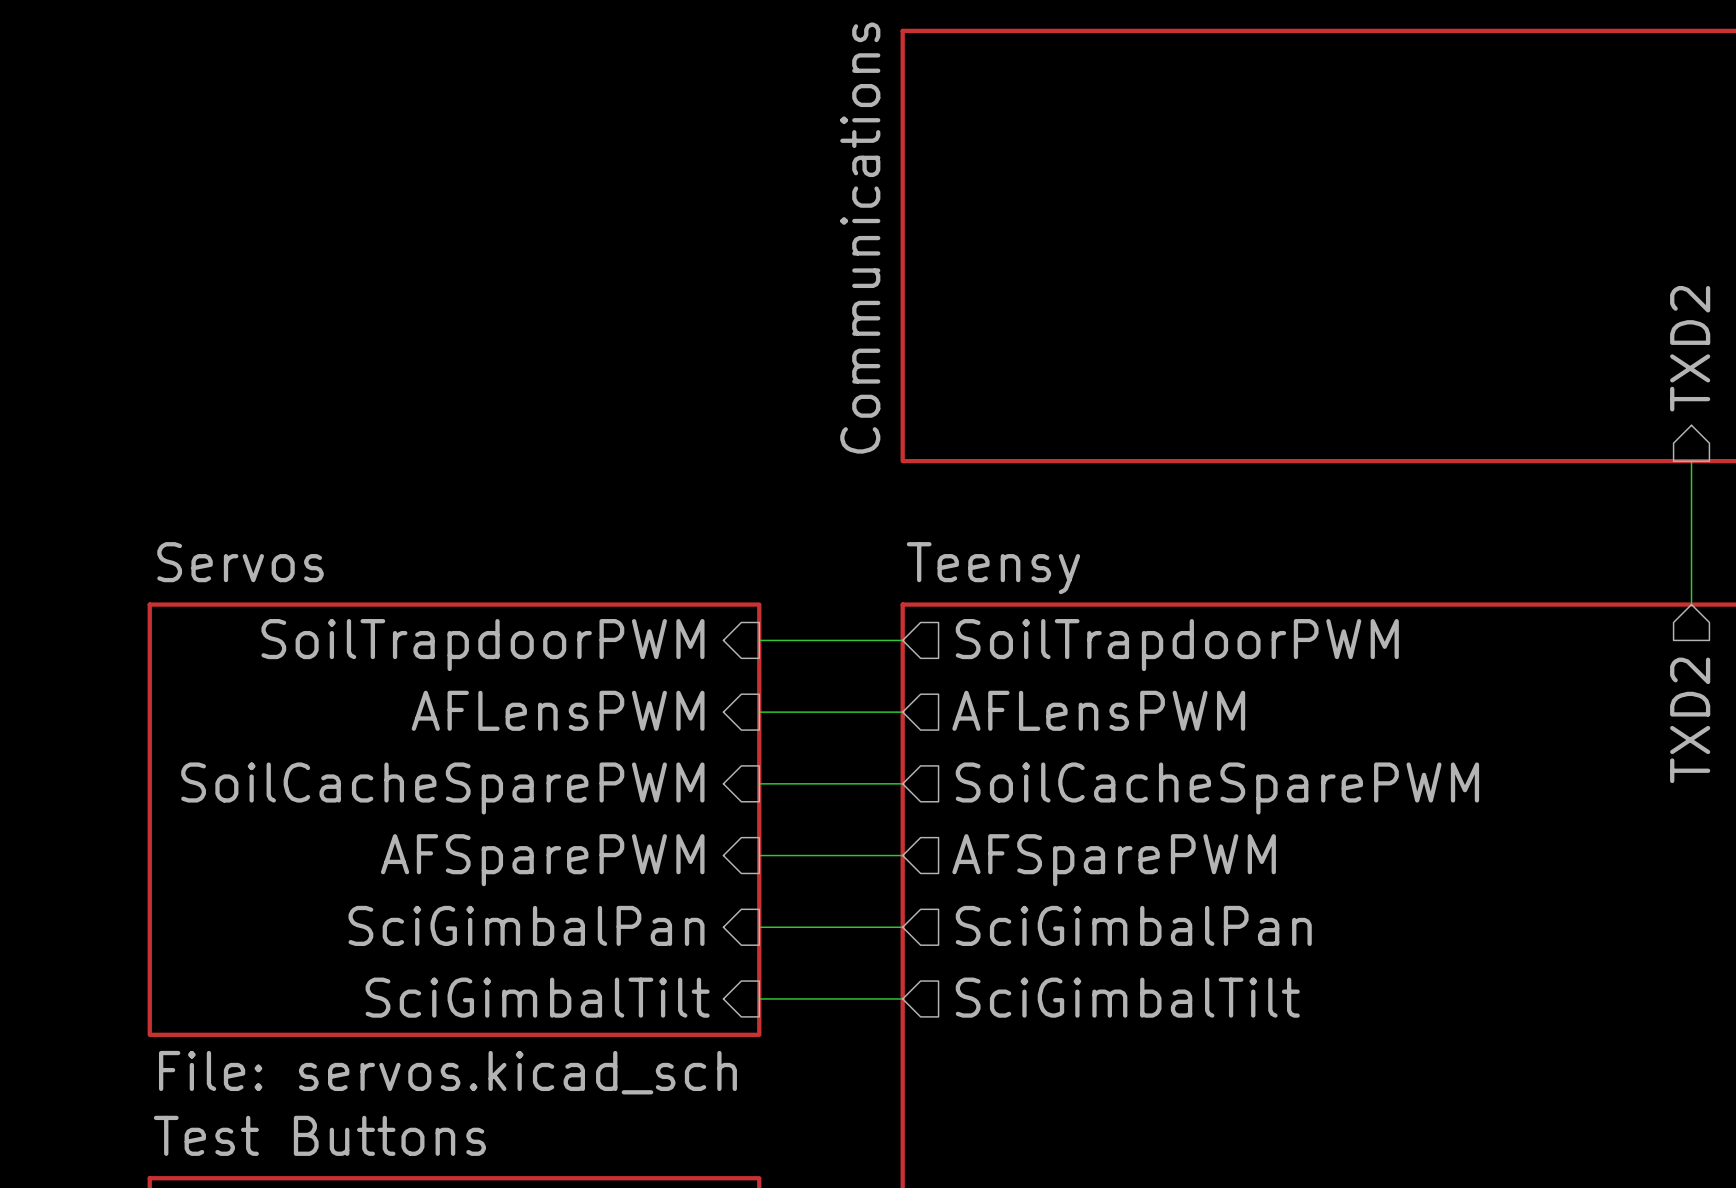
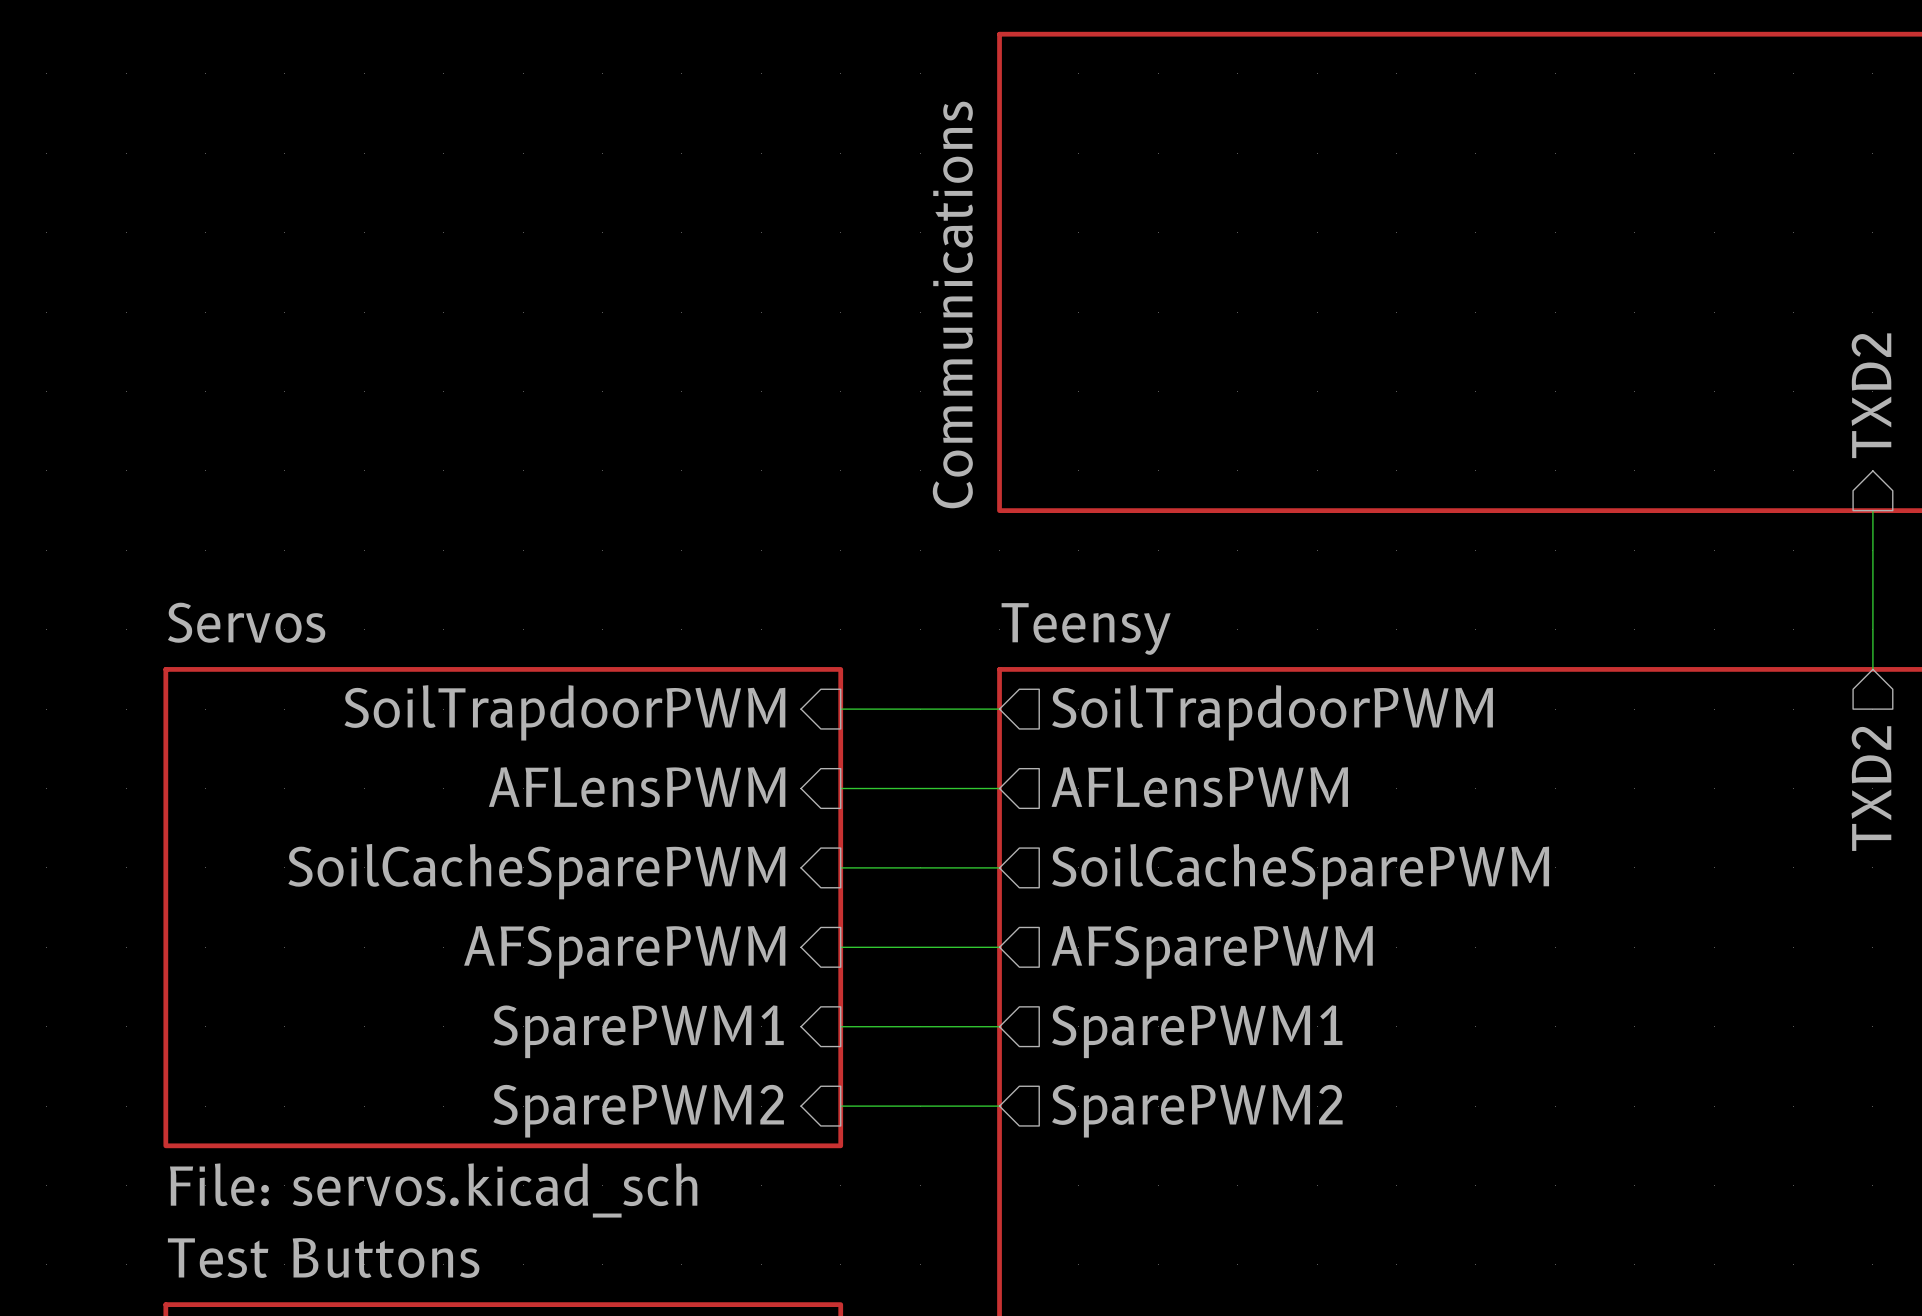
sheet pin: SciGimbalPan (526, 925) -> SparePWM1 (638, 1031)
sheet pin: SciGimbalPan (1133, 925) -> SparePWM1 (1197, 1031)
sheet pin: SciGimbalTilt (537, 997) -> SparePWM2 (638, 1111)
sheet pin: SciGimbalTilt (1127, 997) -> SparePWM2 (1197, 1111)

